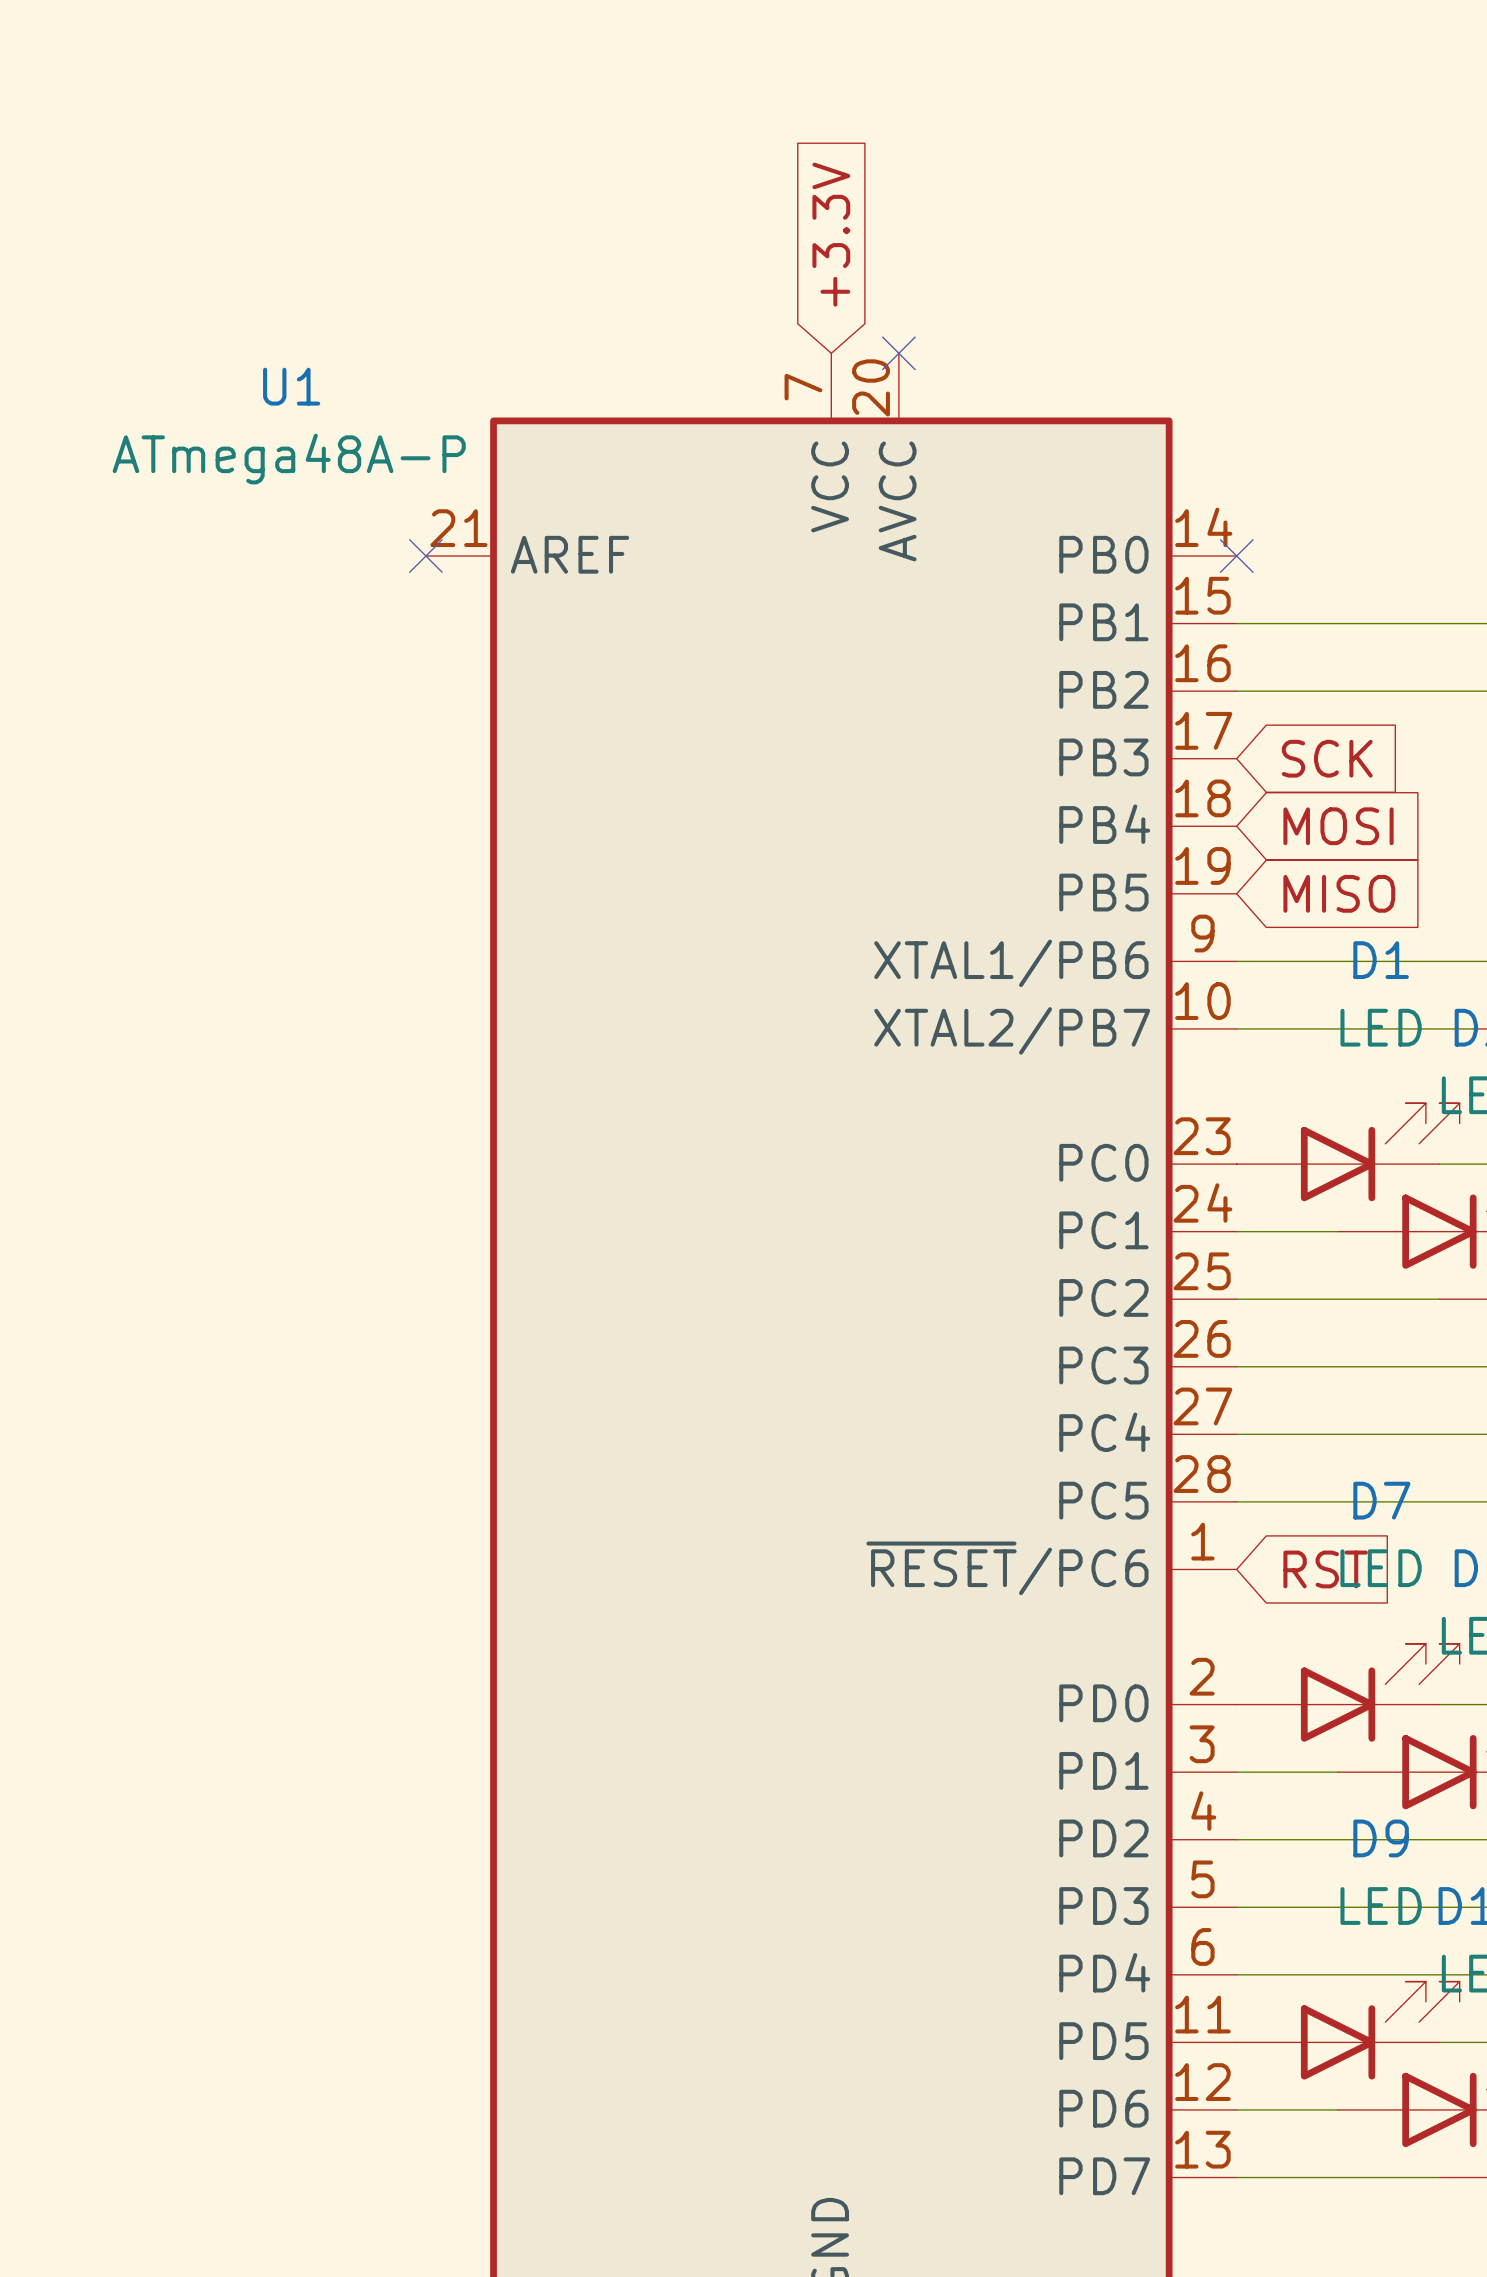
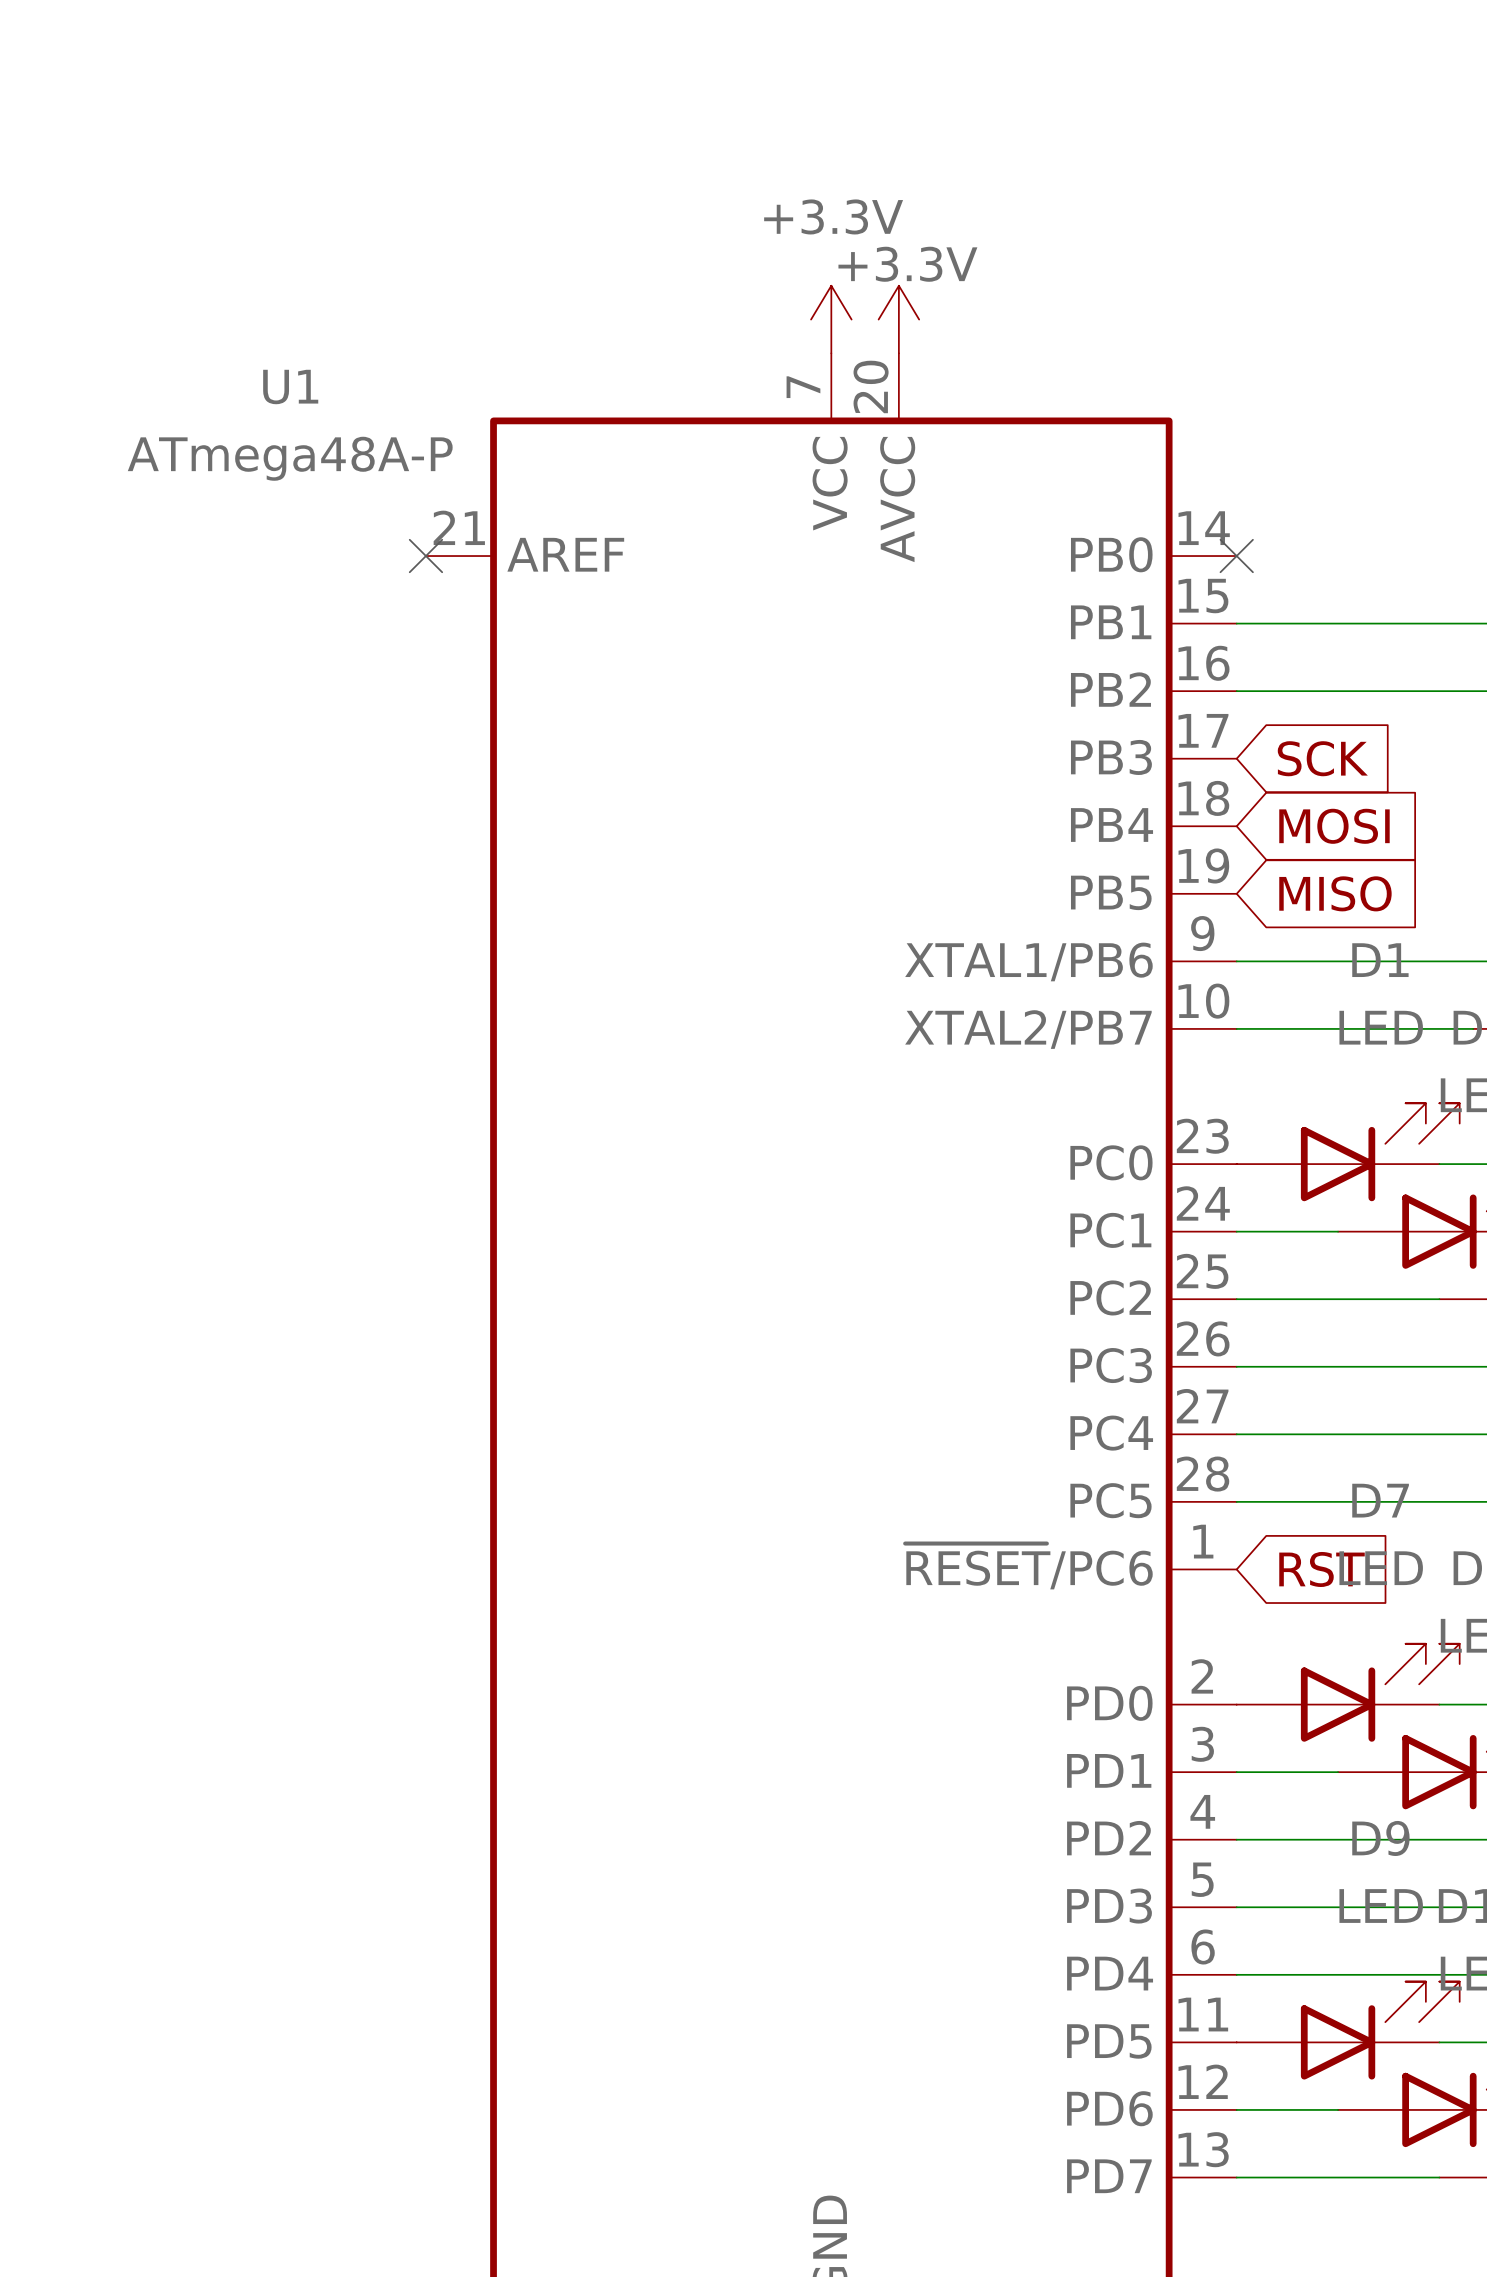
global label: +3.3V (831, 234) -> none
power symbol: none -> +3.3V (831, 319)
power symbol: none -> +3.3V (898, 319)
no-connect mark: (898, 353) -> none

